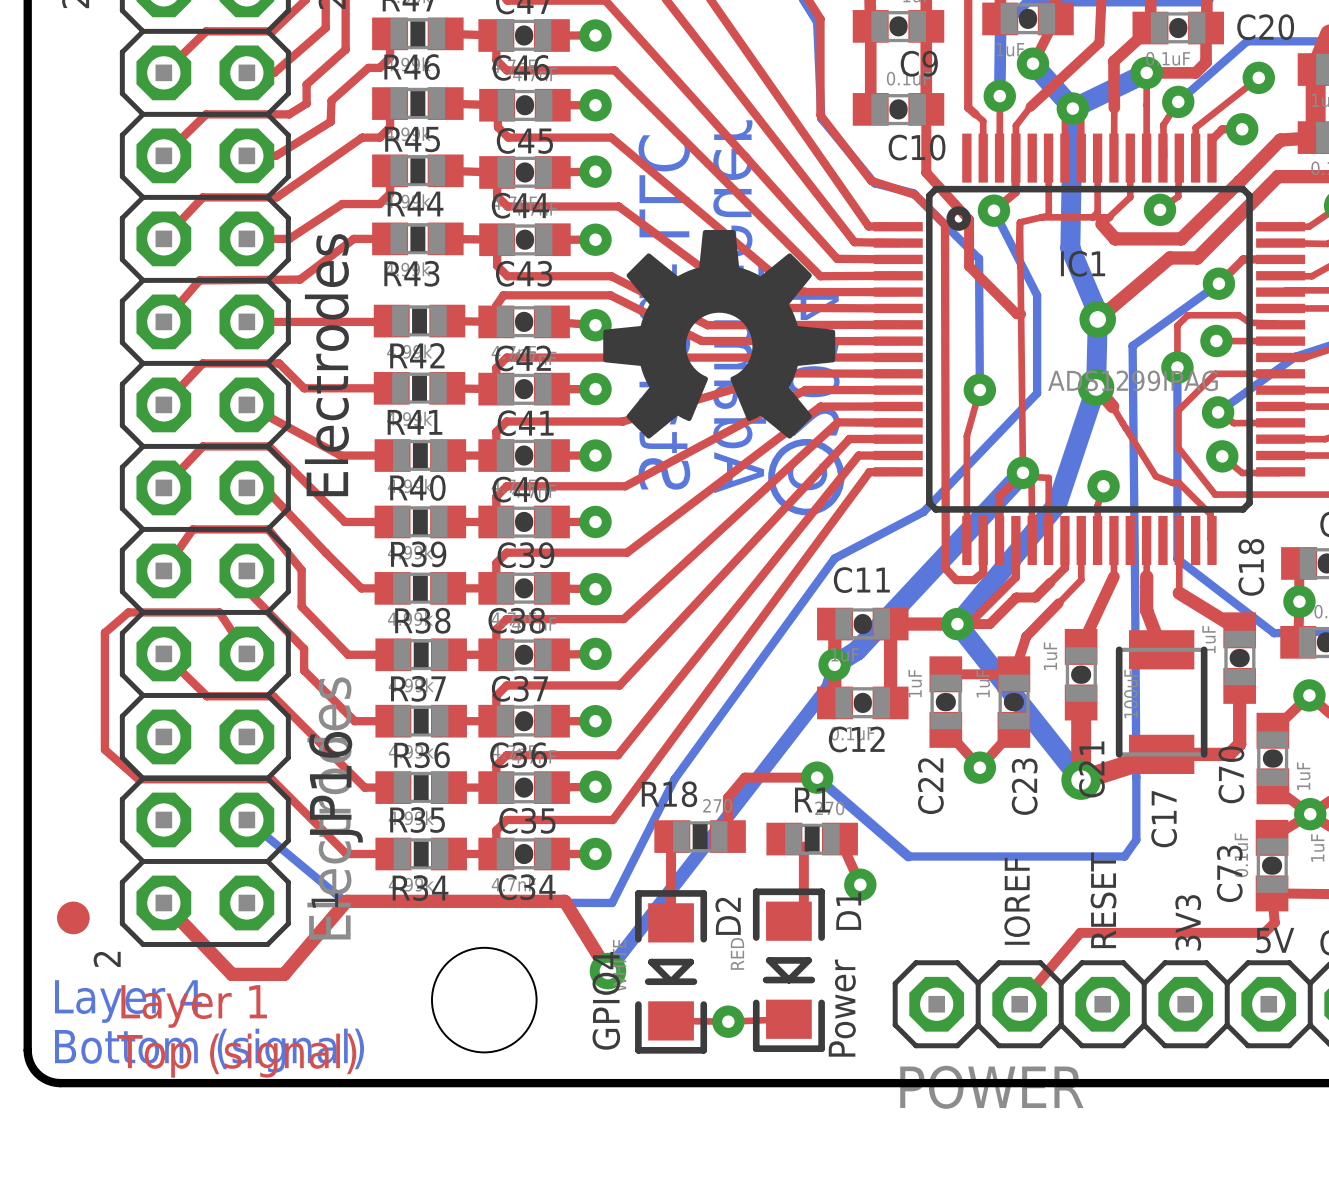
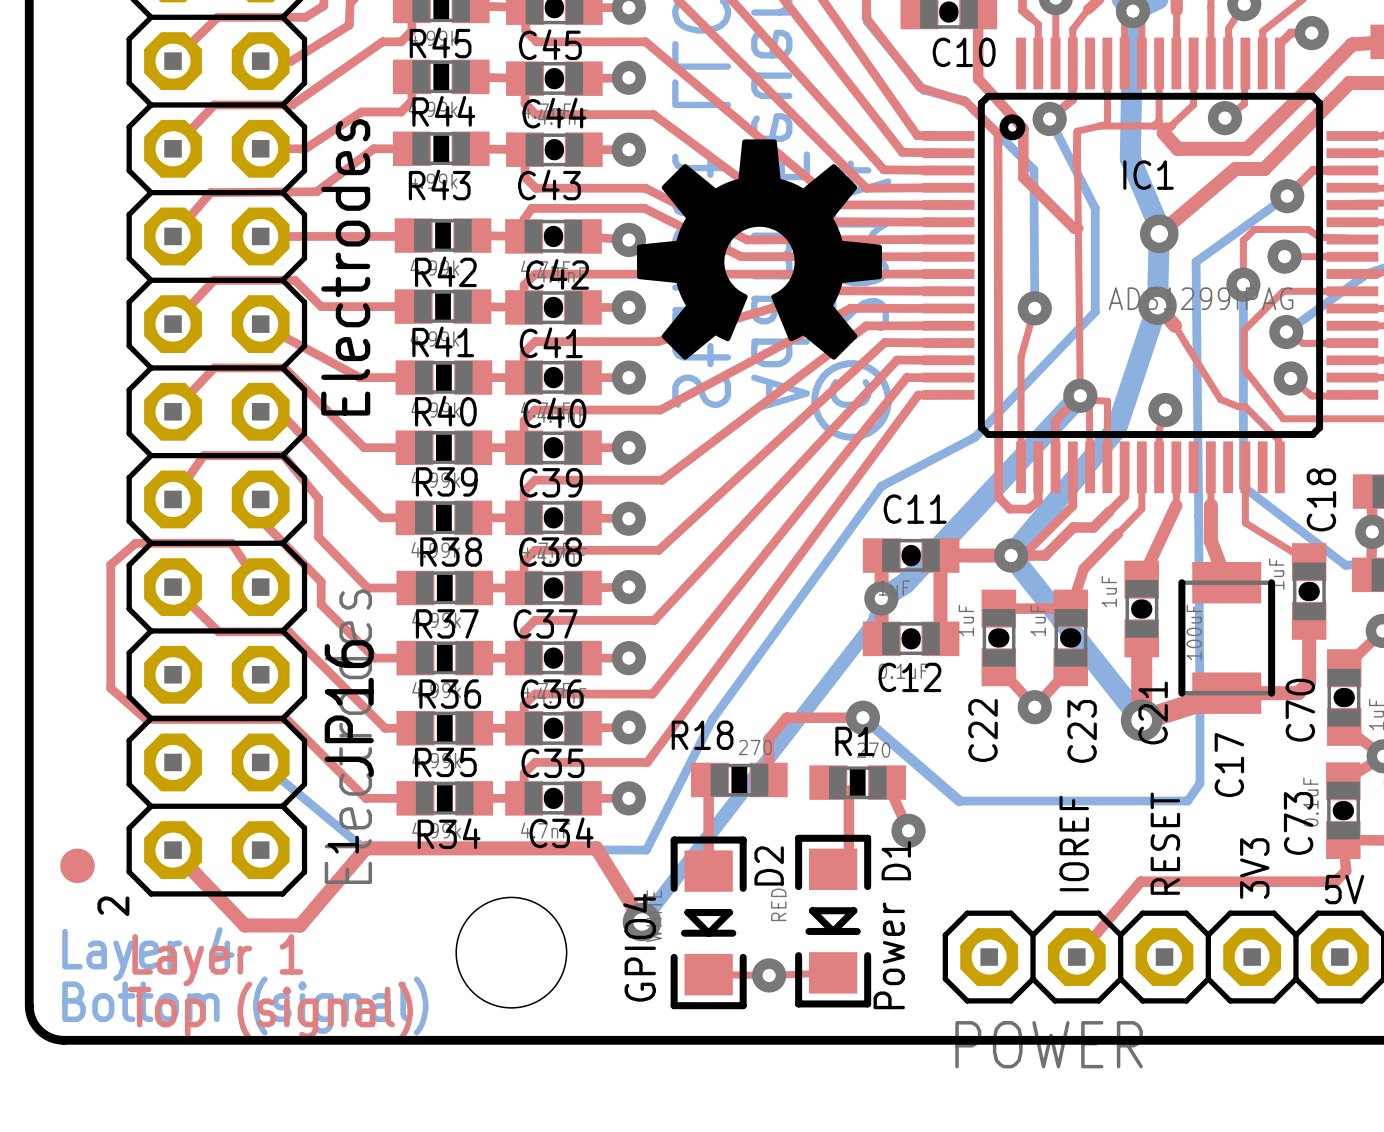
top track width: thick (1179, 593) (1239, 630) -> thin (1245, 522) (1309, 562)

